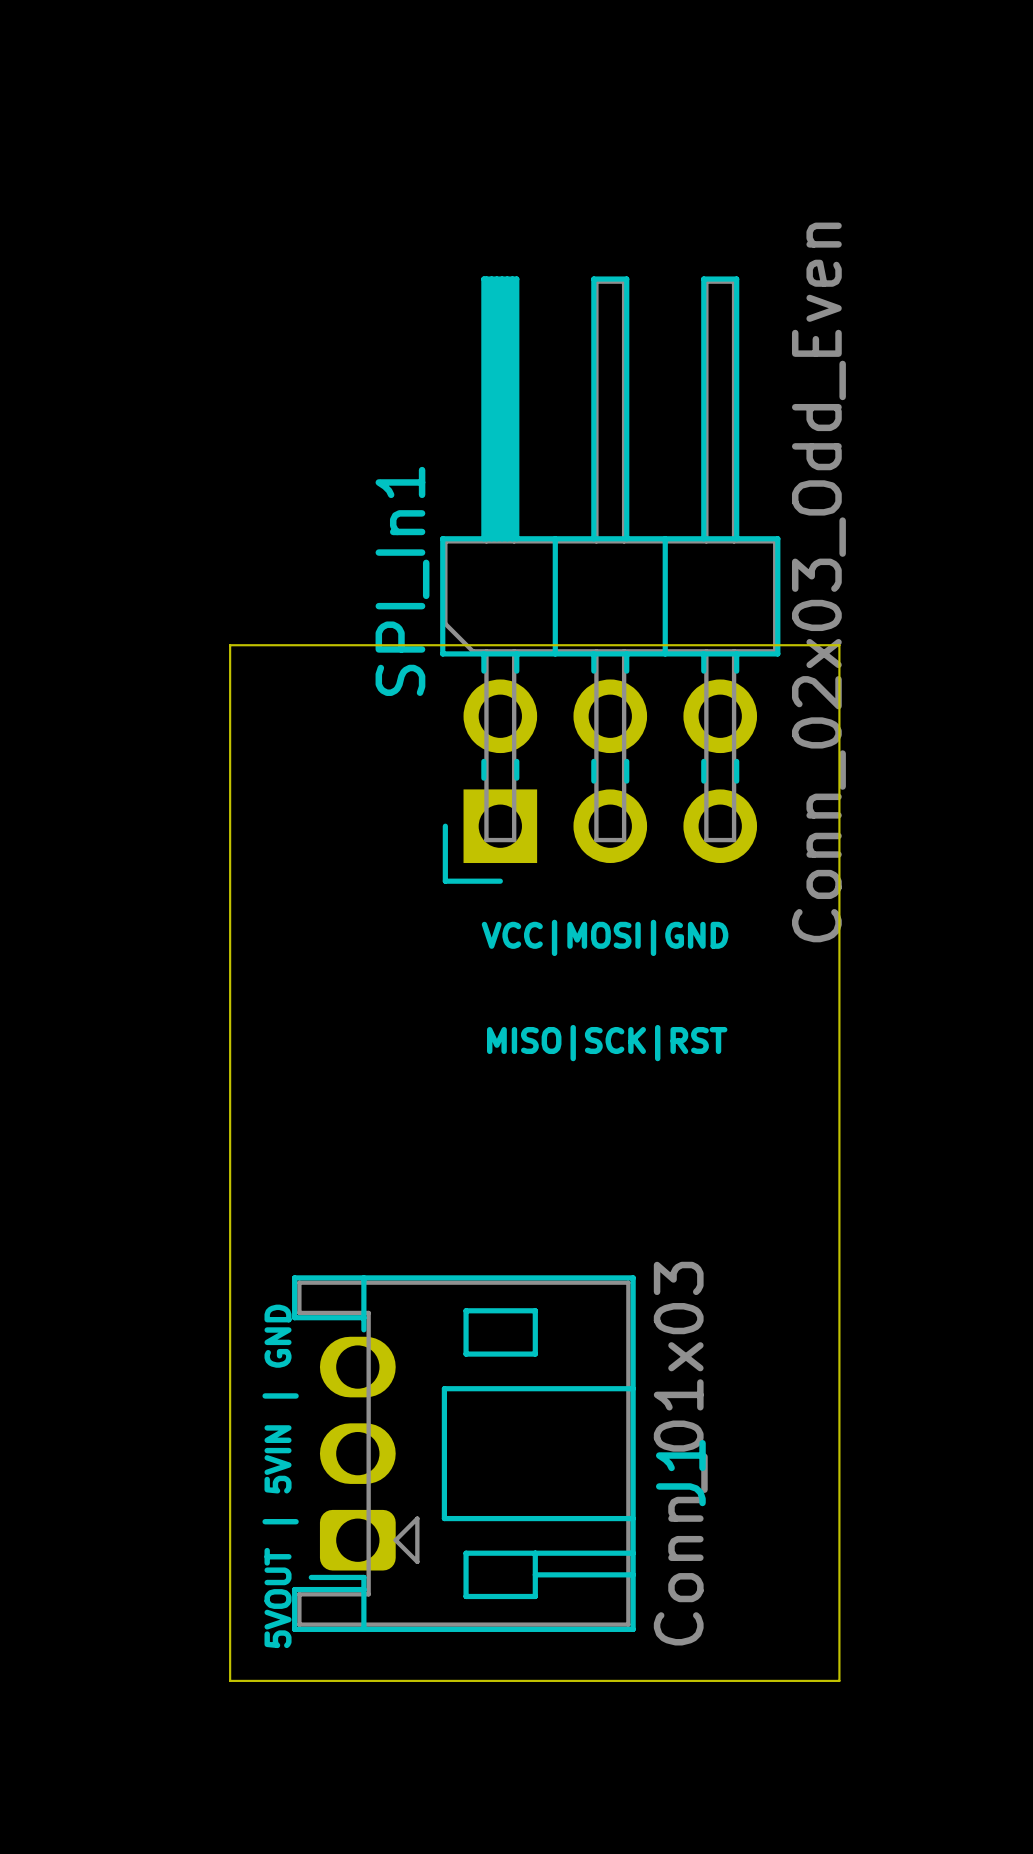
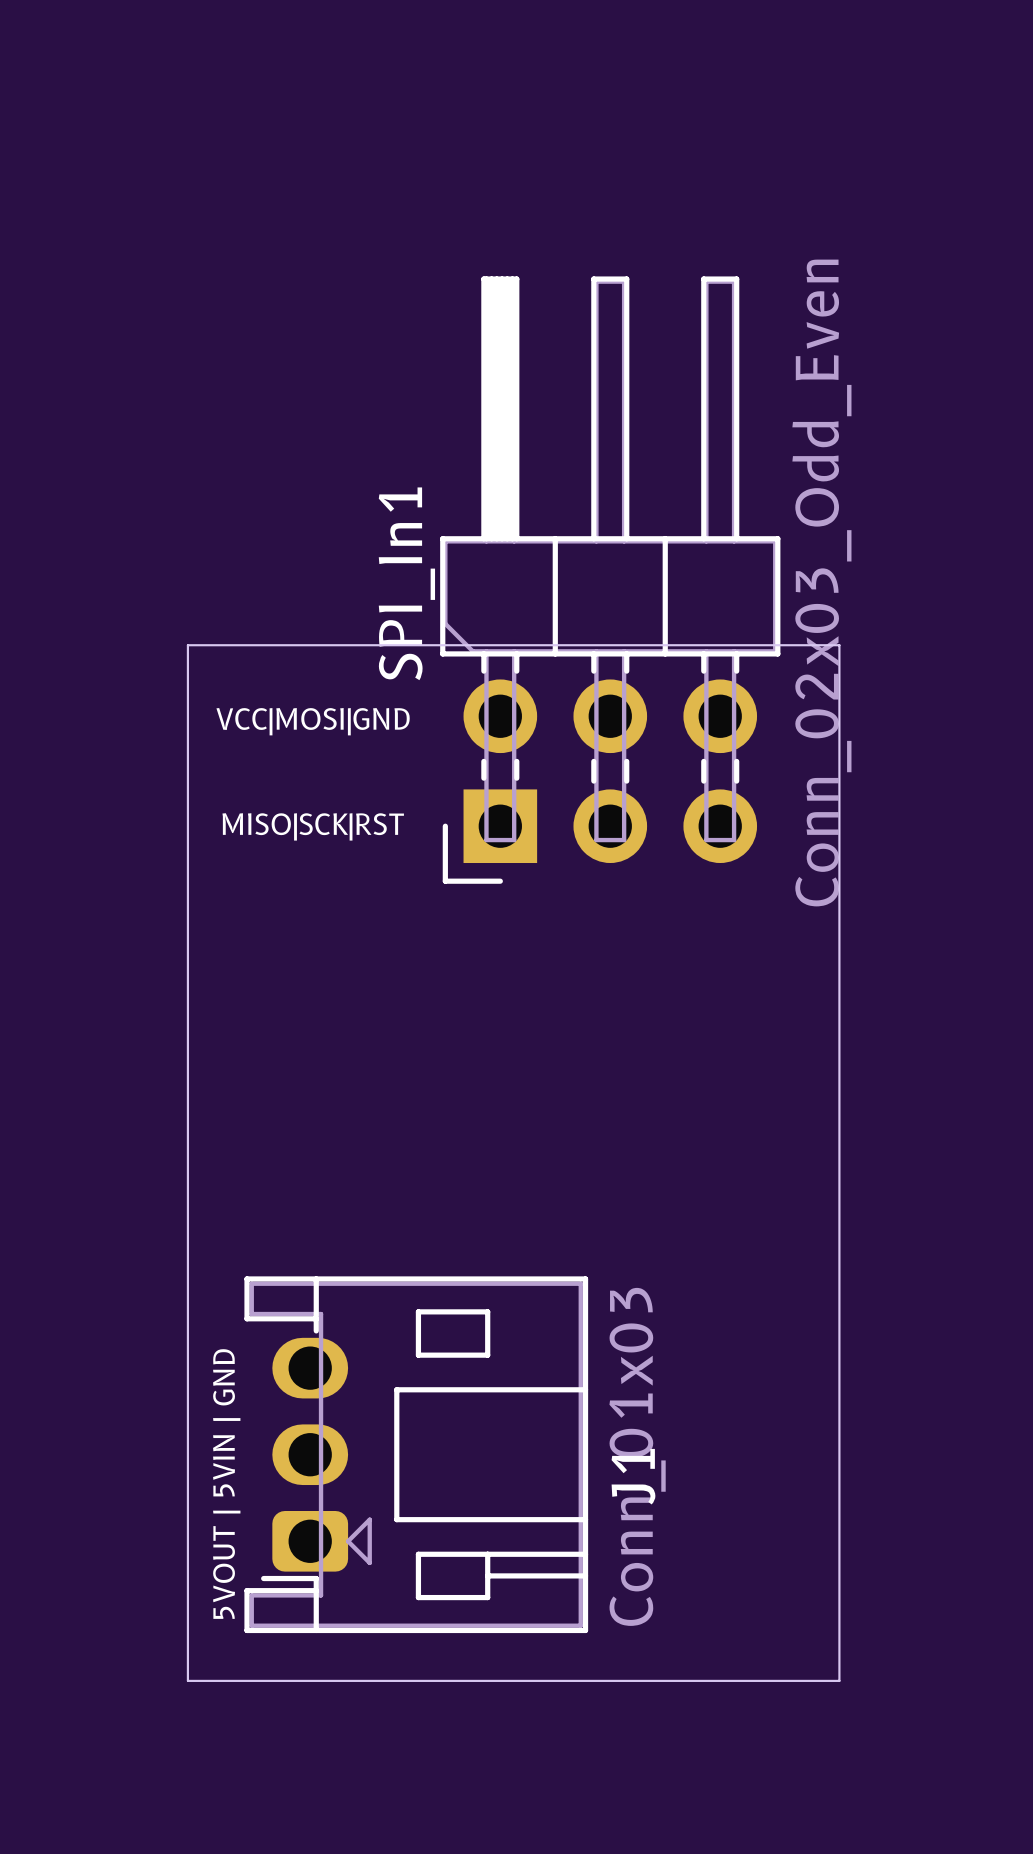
board edge: (230, 645) (230, 1680) -> (230, 645) (187, 645) (187, 1680) (230, 1680)
text position: VCC|MOSI|GND (605, 937) -> VCC|MOSI|GND (313, 721)
text position: MISO|SCK|RST (607, 1043) -> MISO|SCK|RST (313, 826)
J1 position: (463, 1453) -> (416, 1454)
text position: 5VOUT | 5VIN | GND (280, 1476) -> 5VOUT | 5VIN | GND (226, 1484)

